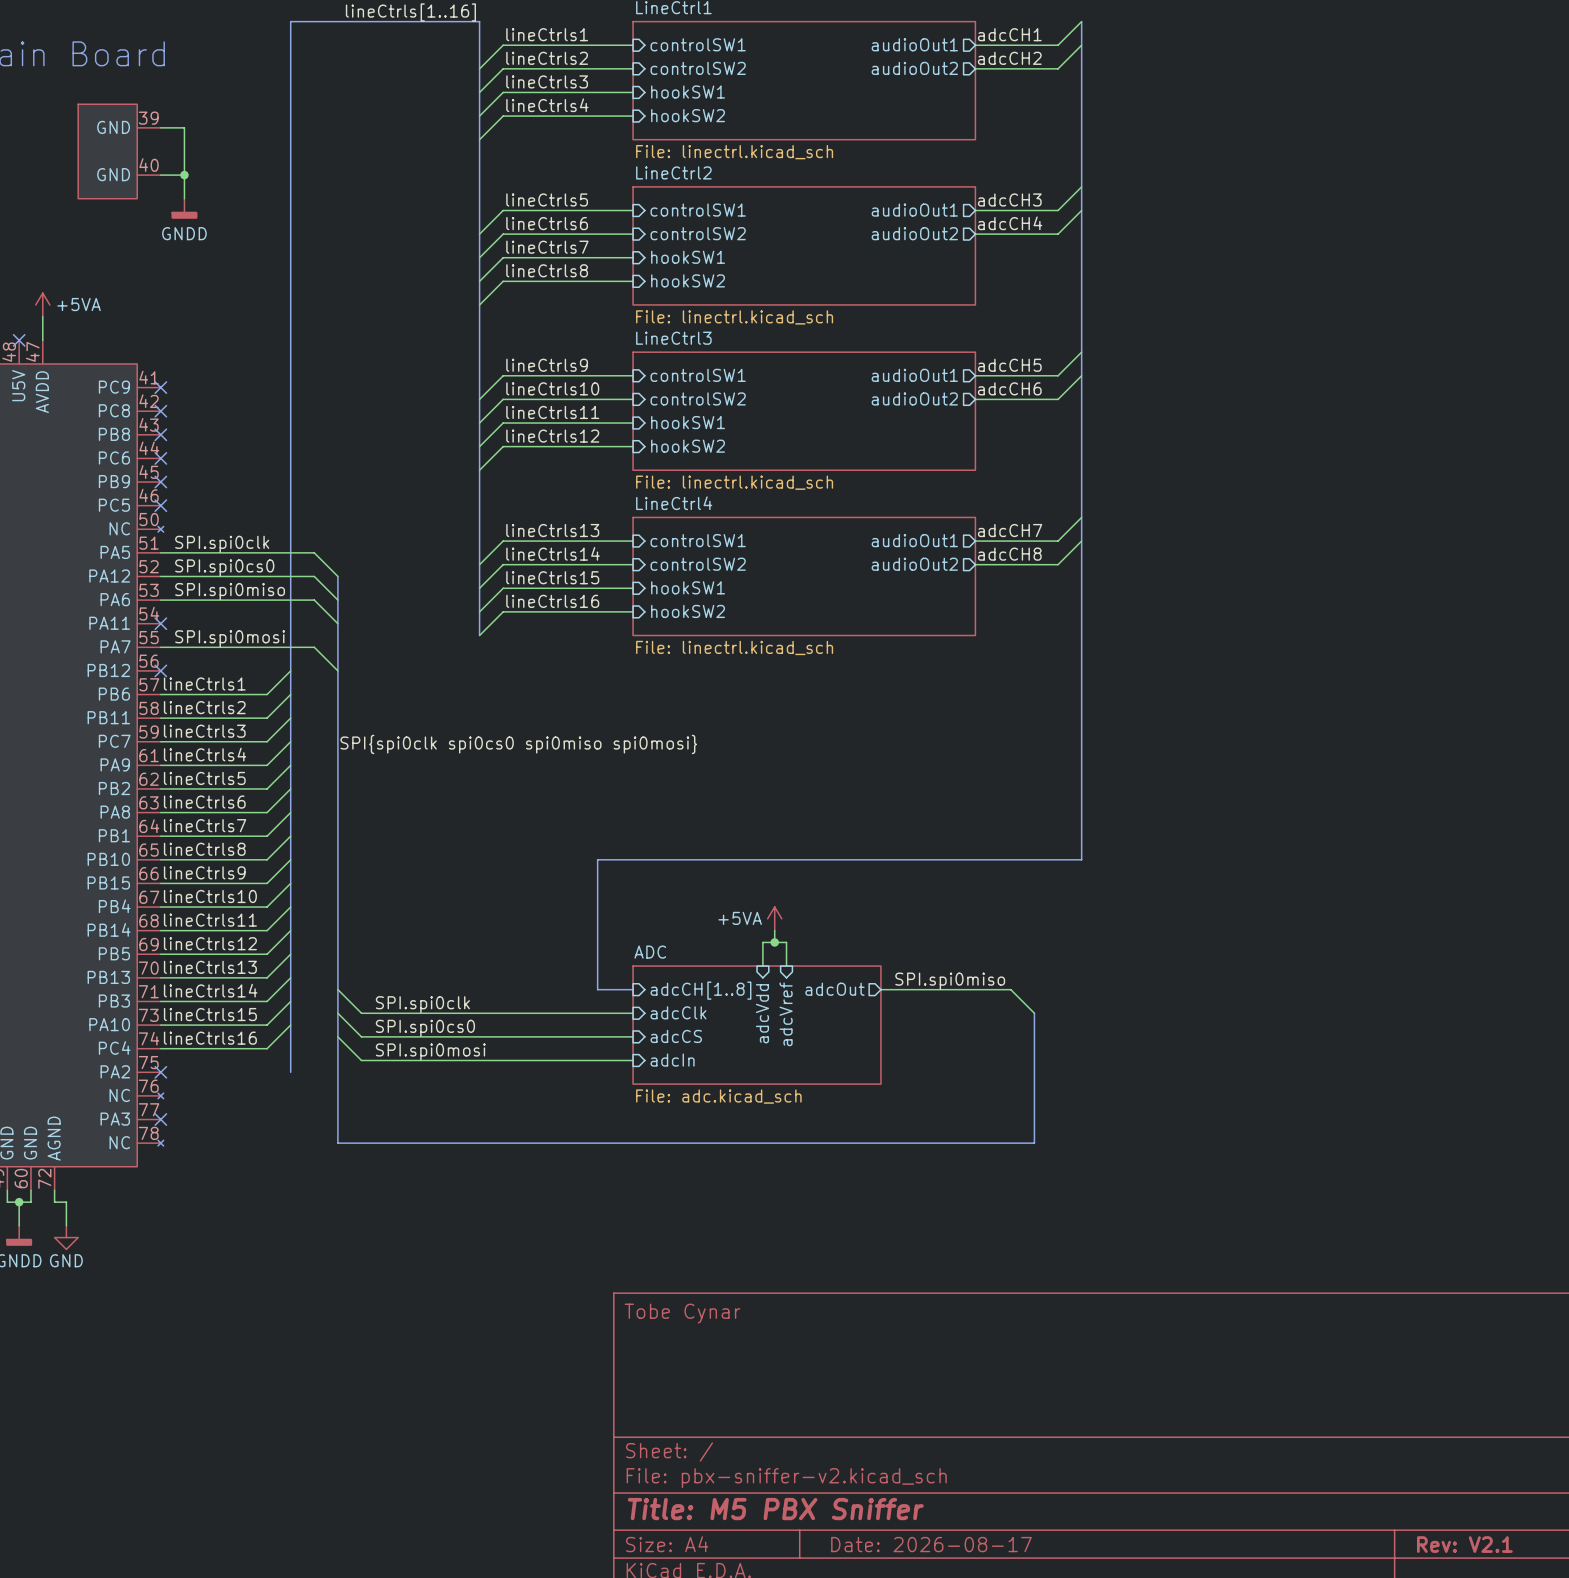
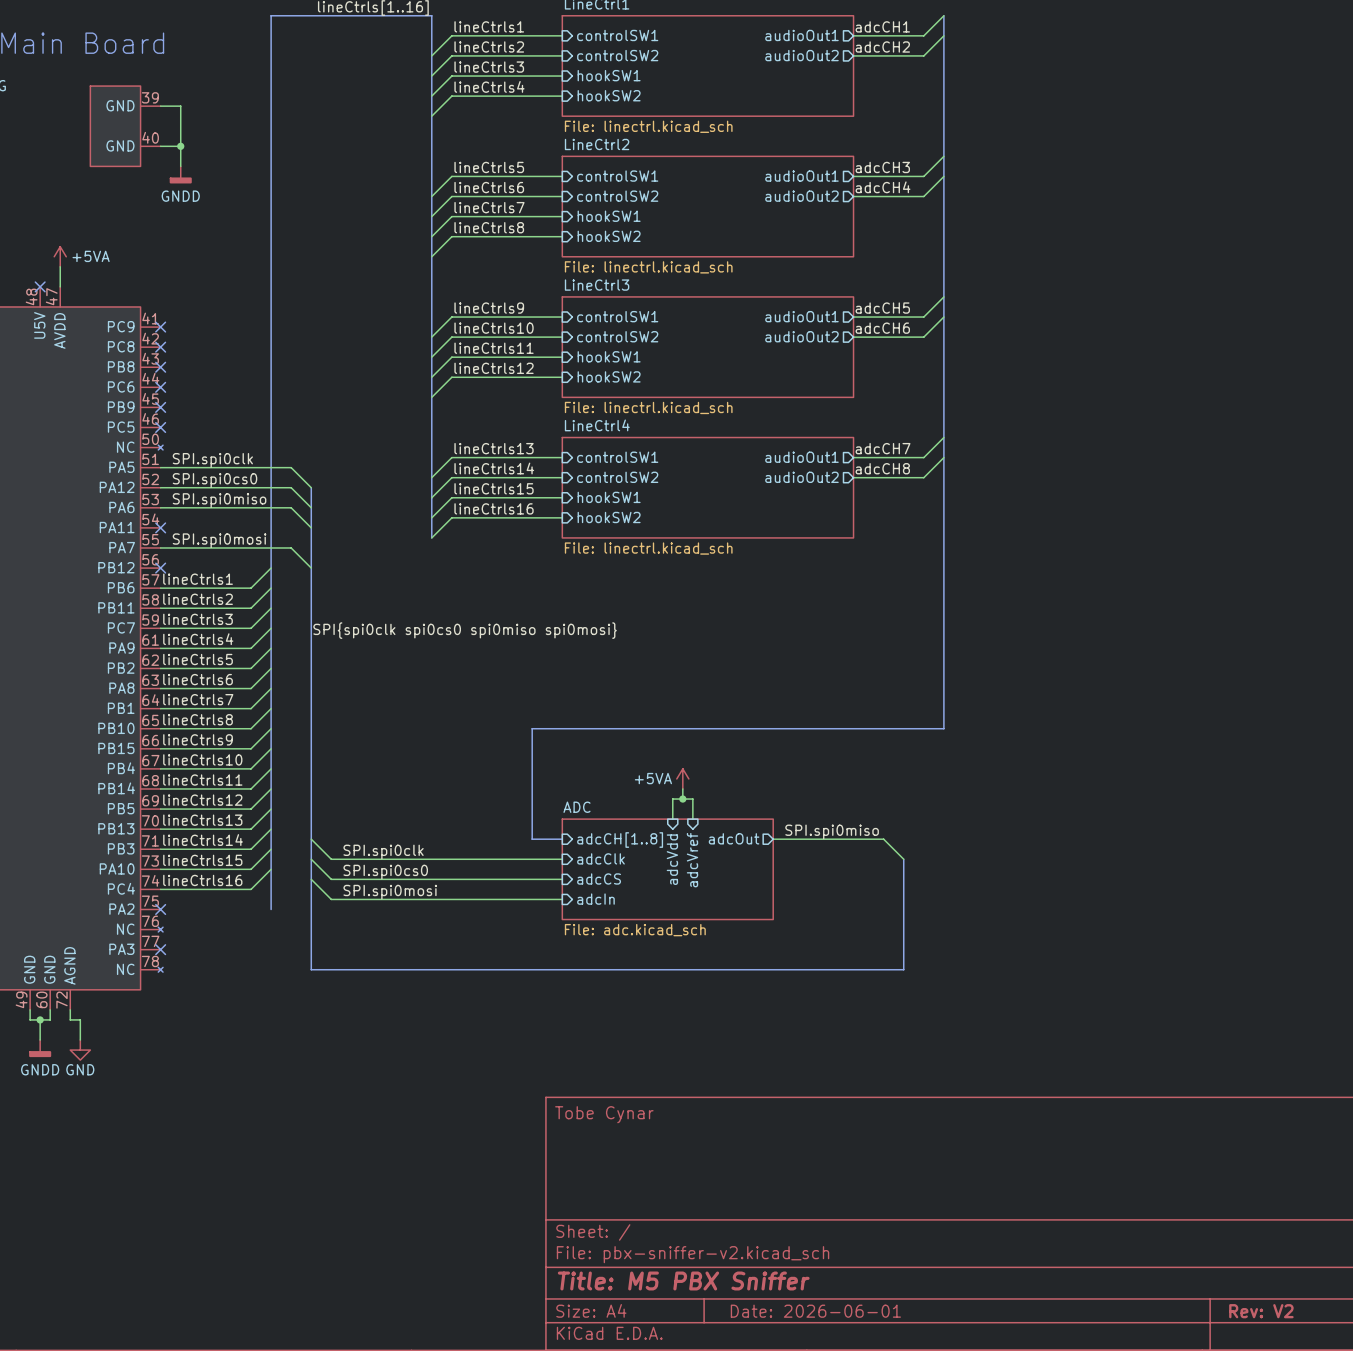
title block: Date: 2026-08-17 (931, 1544) -> Date: 2026-06-01 (815, 1311)
title block: Rev: V2.1 (1464, 1544) -> Rev: V2 (1261, 1311)

